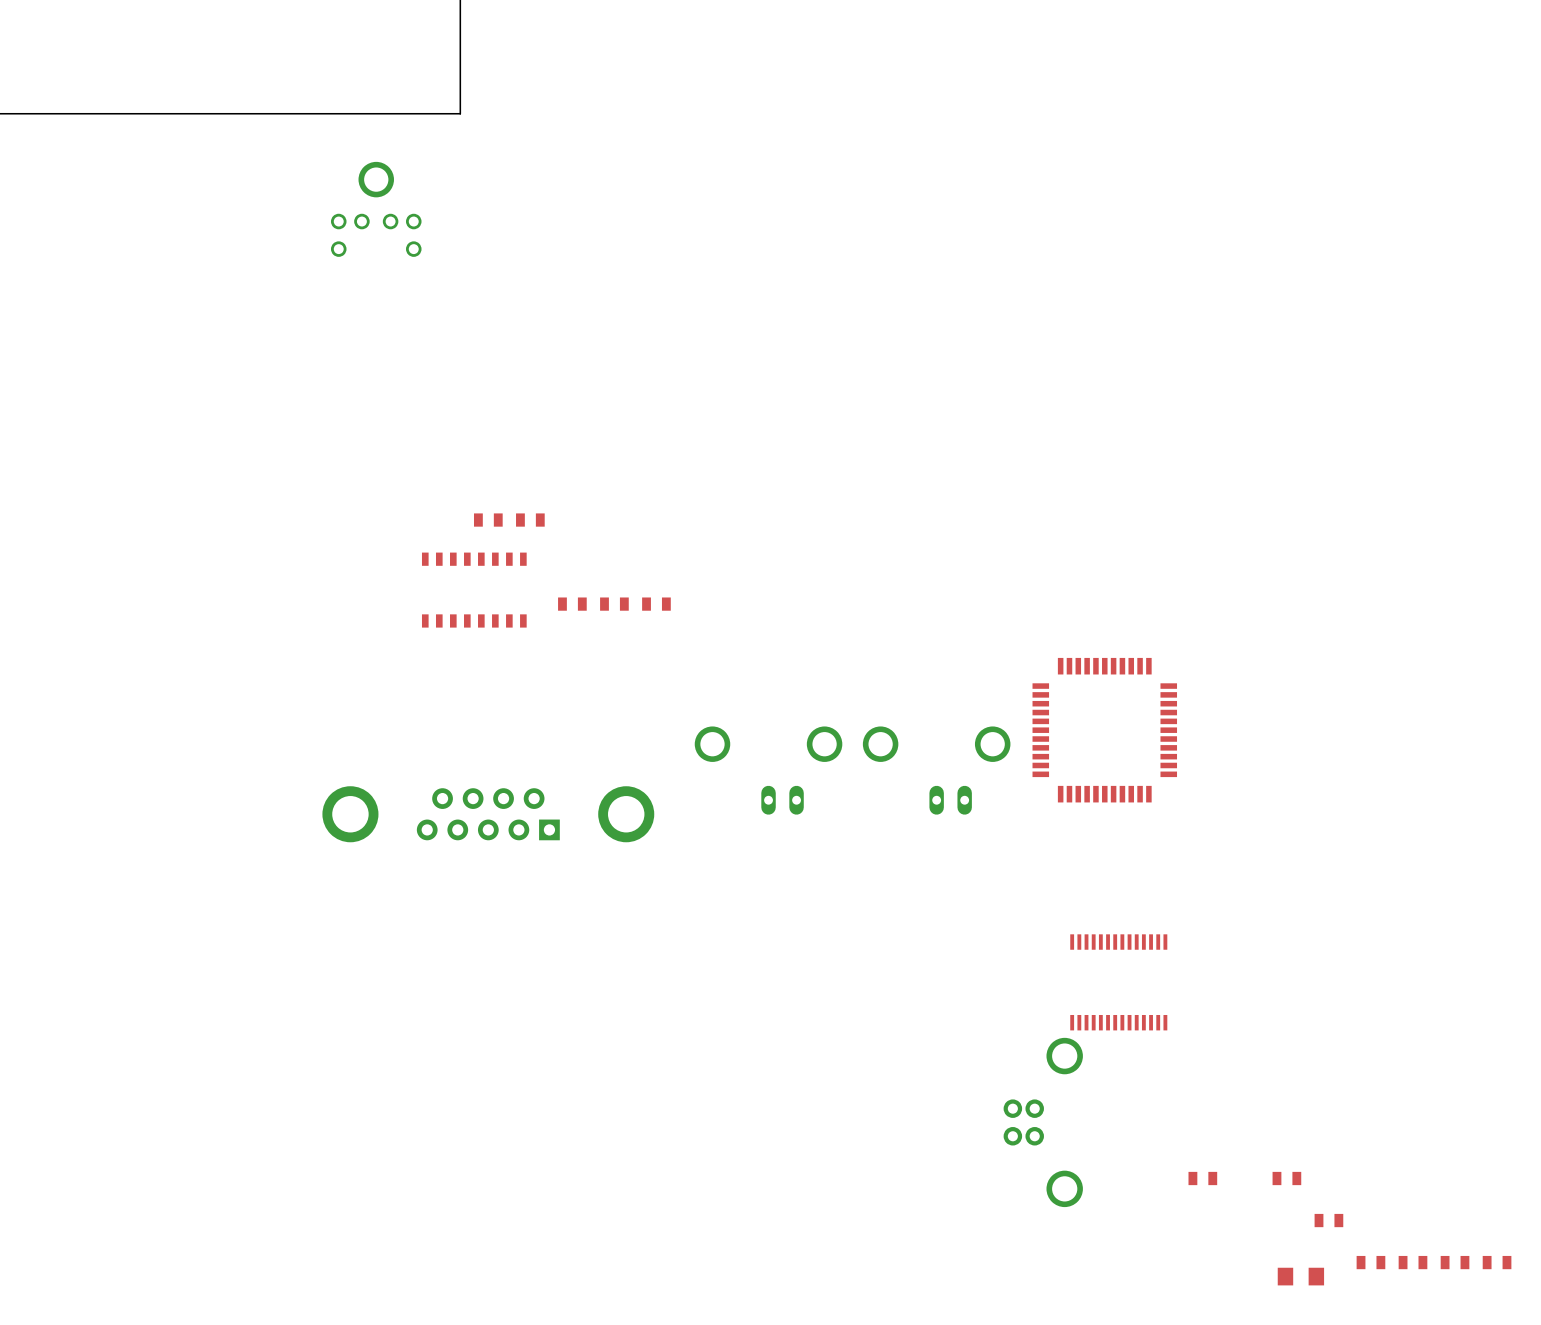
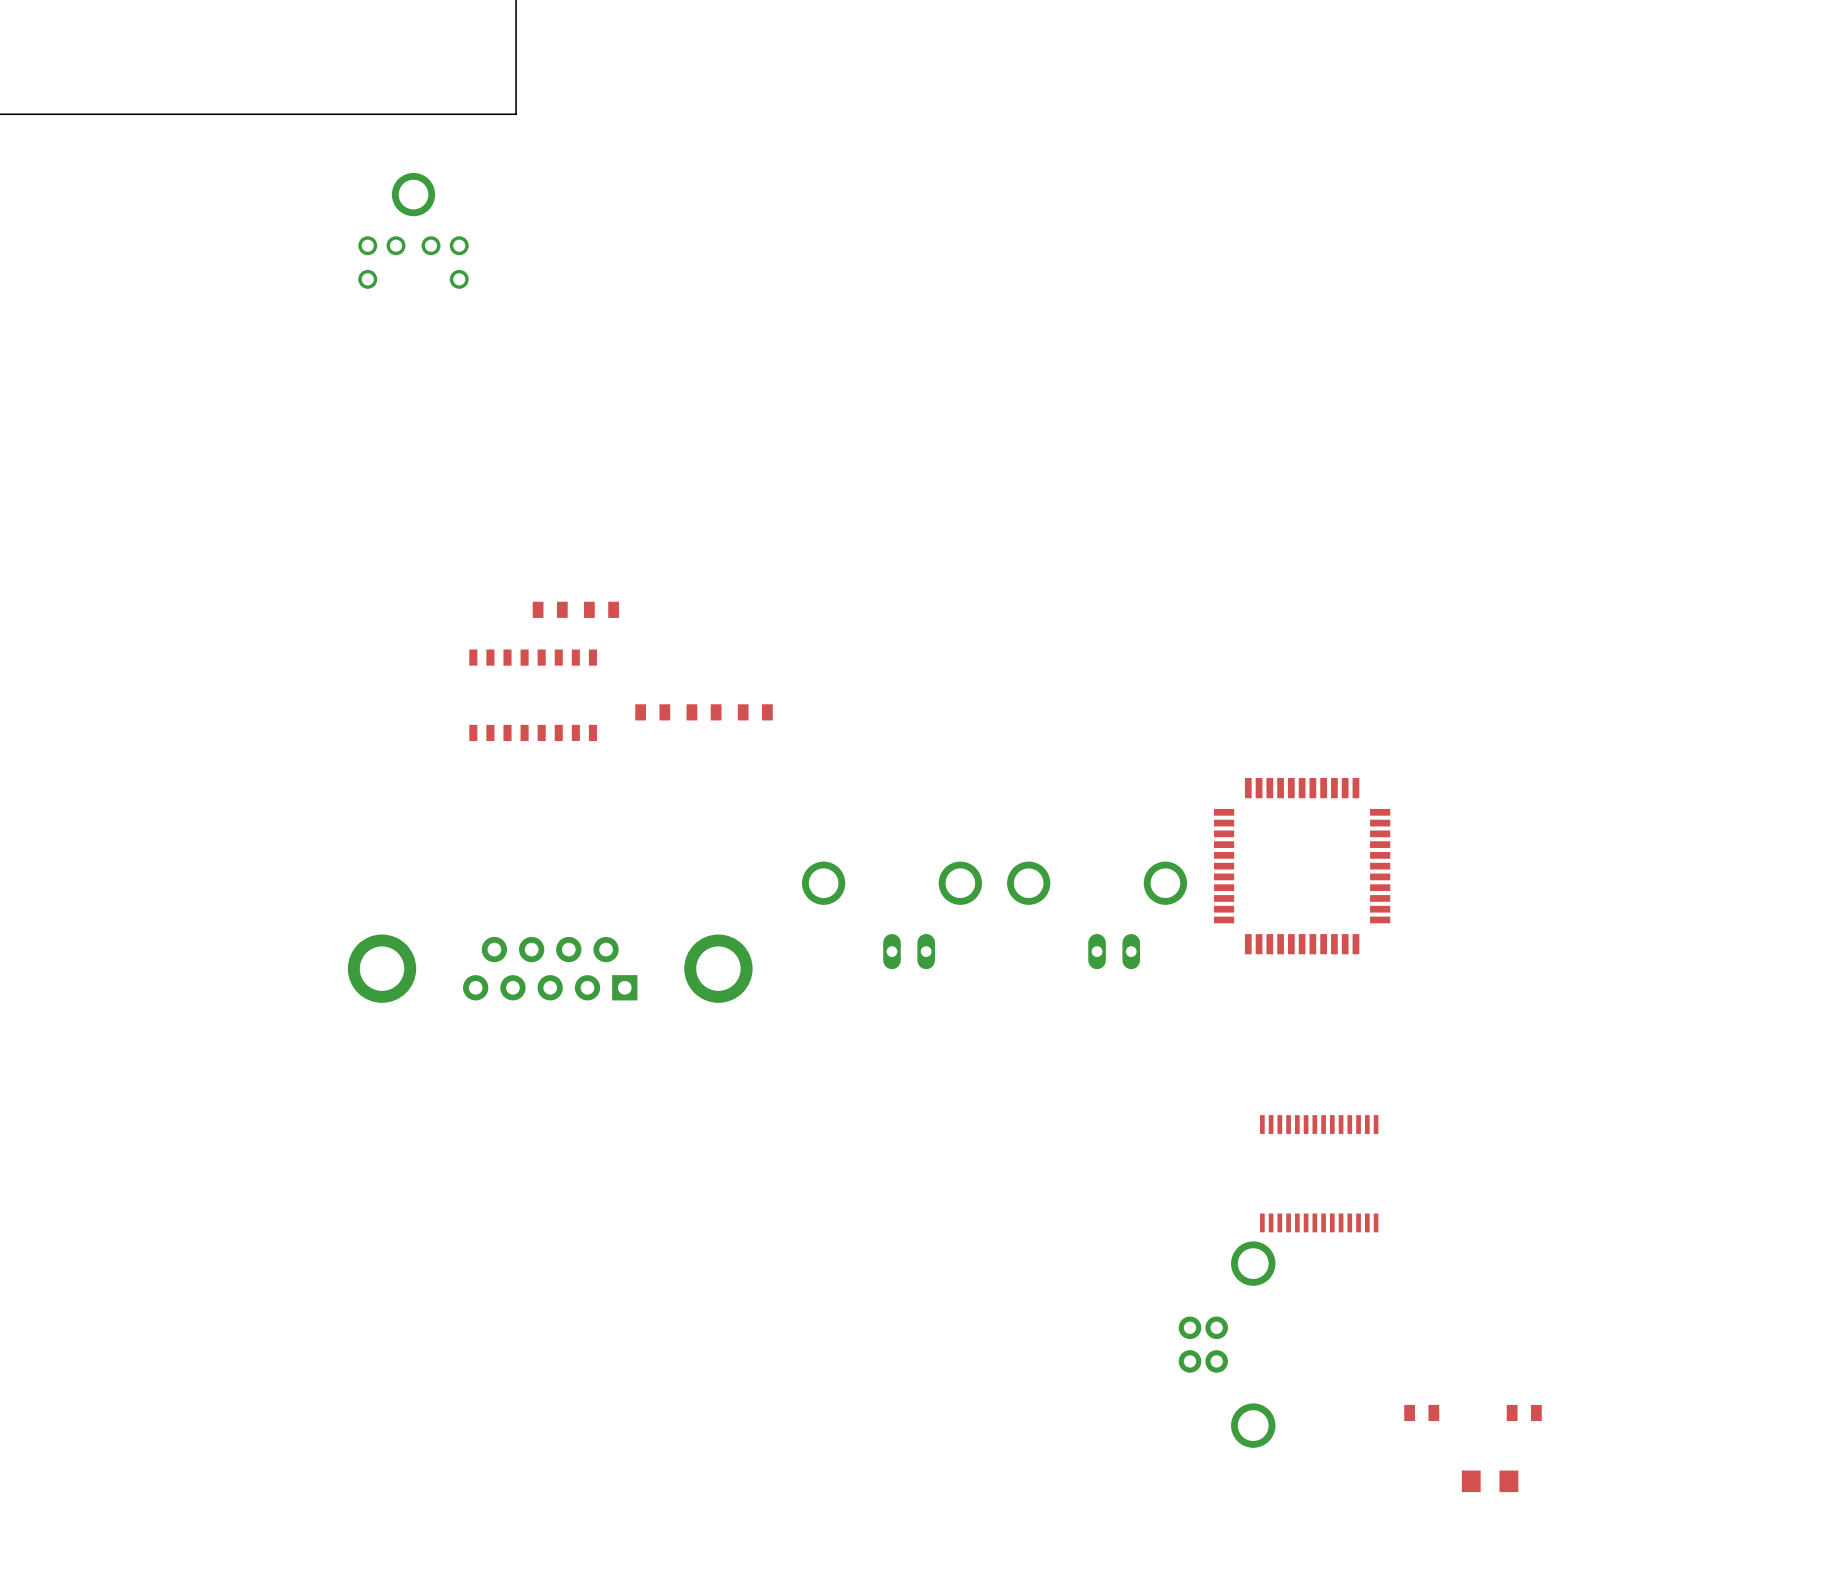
part: (1328, 1220) -> none
part: (1370, 1262) -> none
part: (1412, 1262) -> none
part: (1455, 1262) -> none
part: (1497, 1262) -> none
part position: (1300, 1276) -> (1490, 1481)

